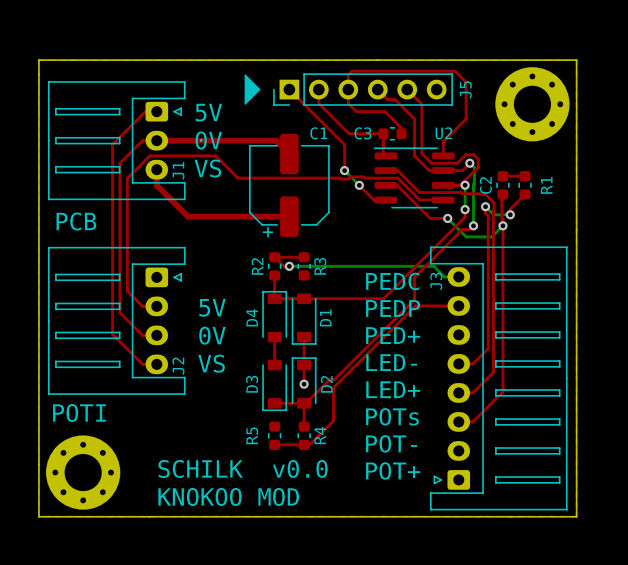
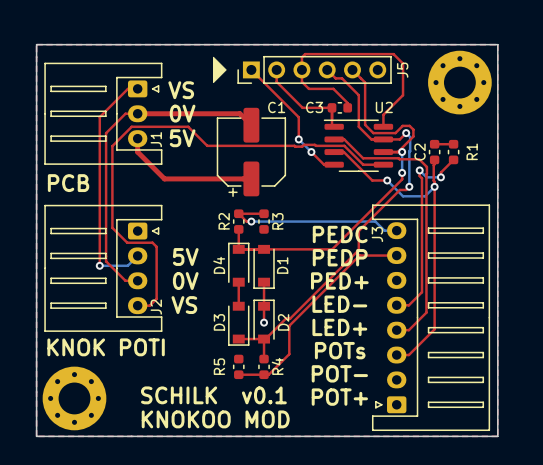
text: 5V (208, 112) -> VS (181, 90)
text: VS (207, 168) -> 5V (182, 138)
top track: (127, 273) (127, 291) (142, 306) (156, 306) -> none
bottom track: none -> (137, 255) (127, 265) (99, 265)
top track: (112, 317) (112, 334) (142, 364) (156, 364) -> (112, 227) (127, 242) (152, 242) (156, 246) (156, 298) (149, 305) (137, 305)
via: none -> (99, 265)
text: POTI (79, 412) -> KNOK POTI (106, 347)
text: SCHILK v0.0 (243, 468) -> SCHILK v0.1 (213, 395)

